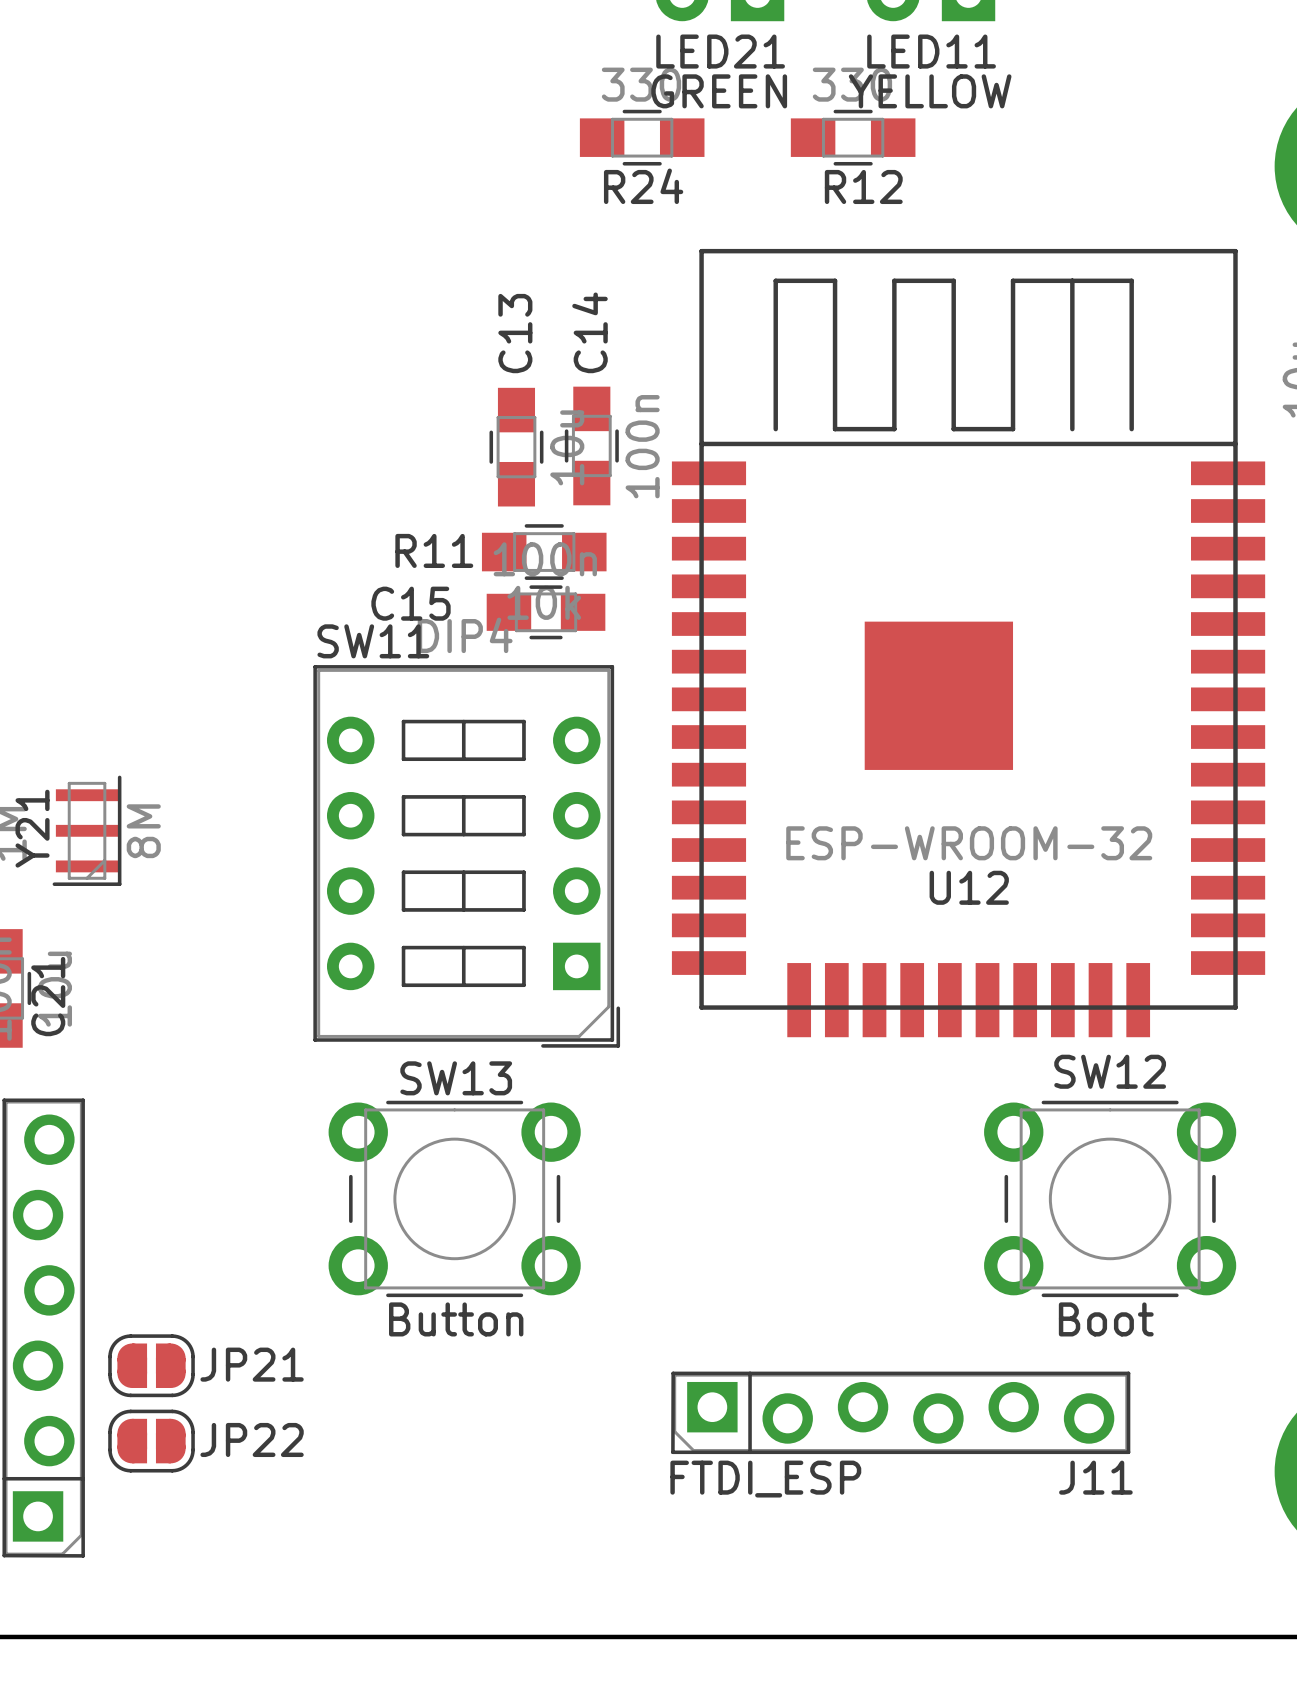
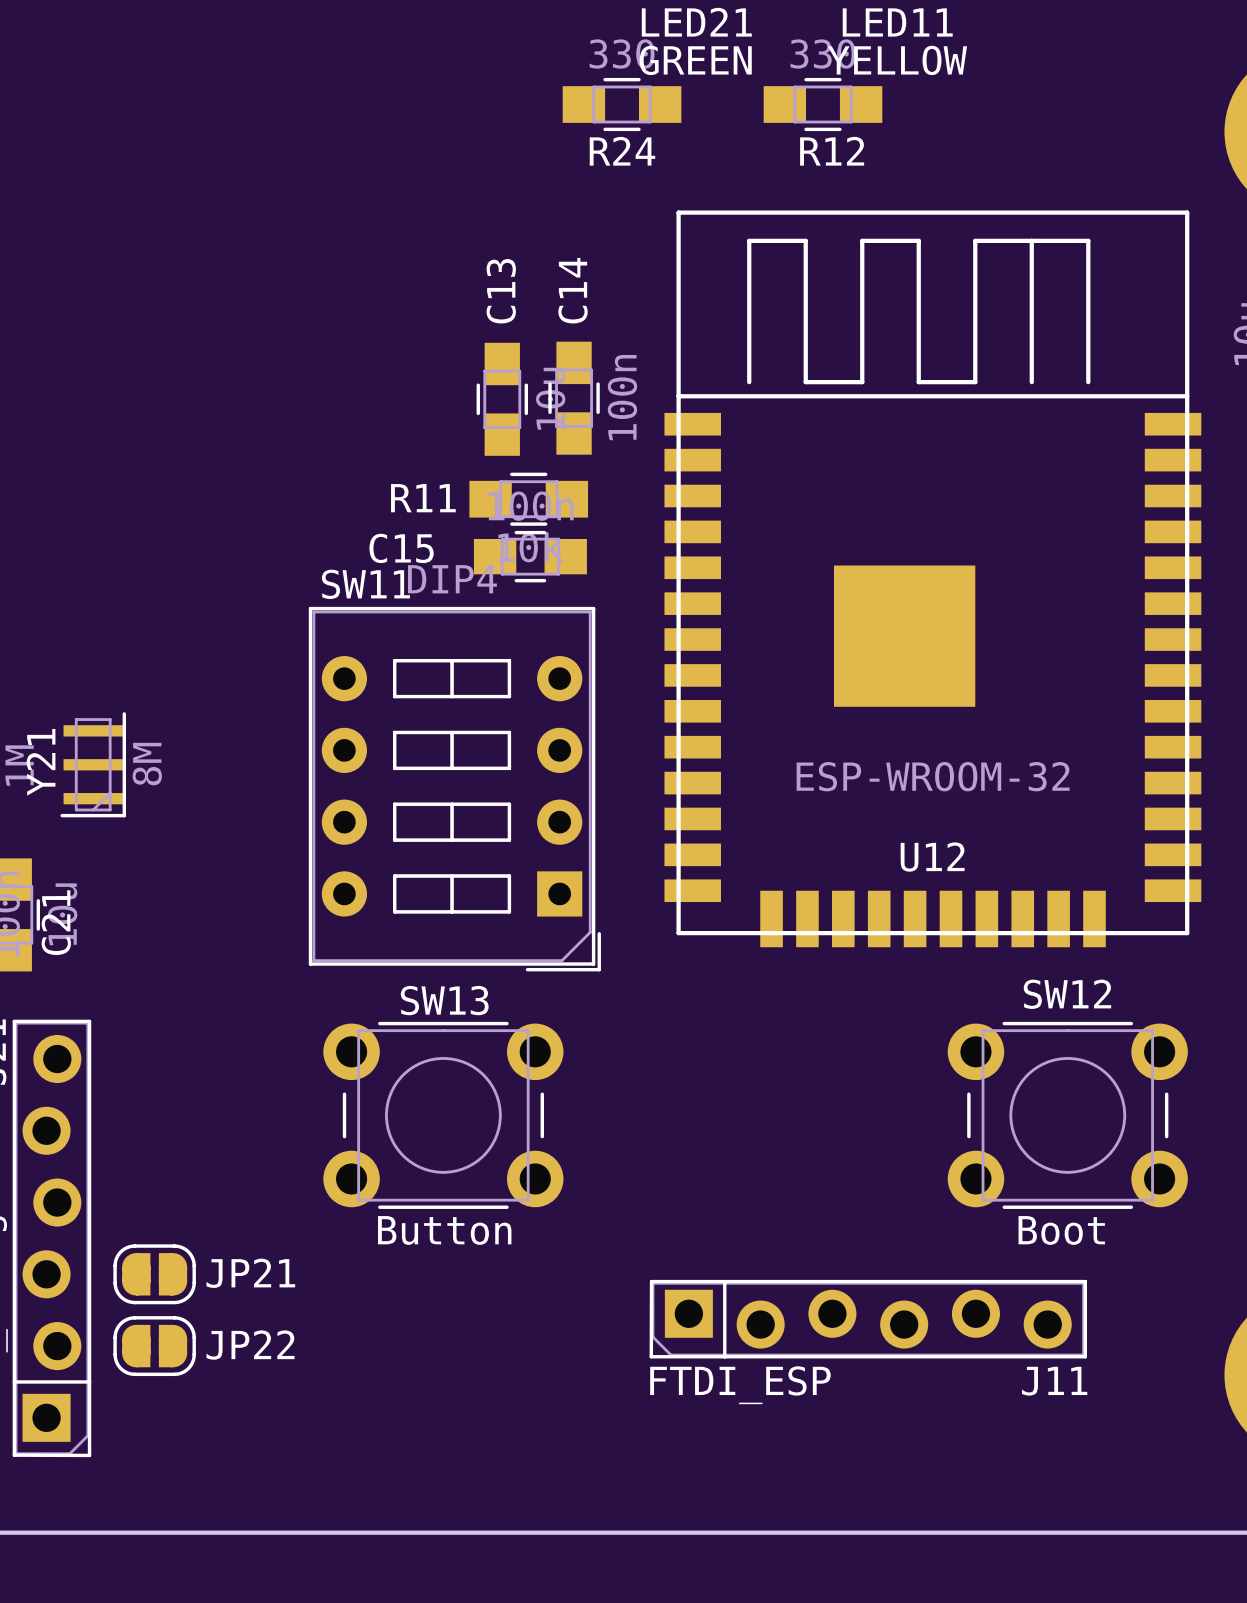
U12 footprint: [671, 248, 1266, 1038] -> [664, 210, 1202, 948]
U12 name position: U12 (969, 887) -> U12 (932, 857)

